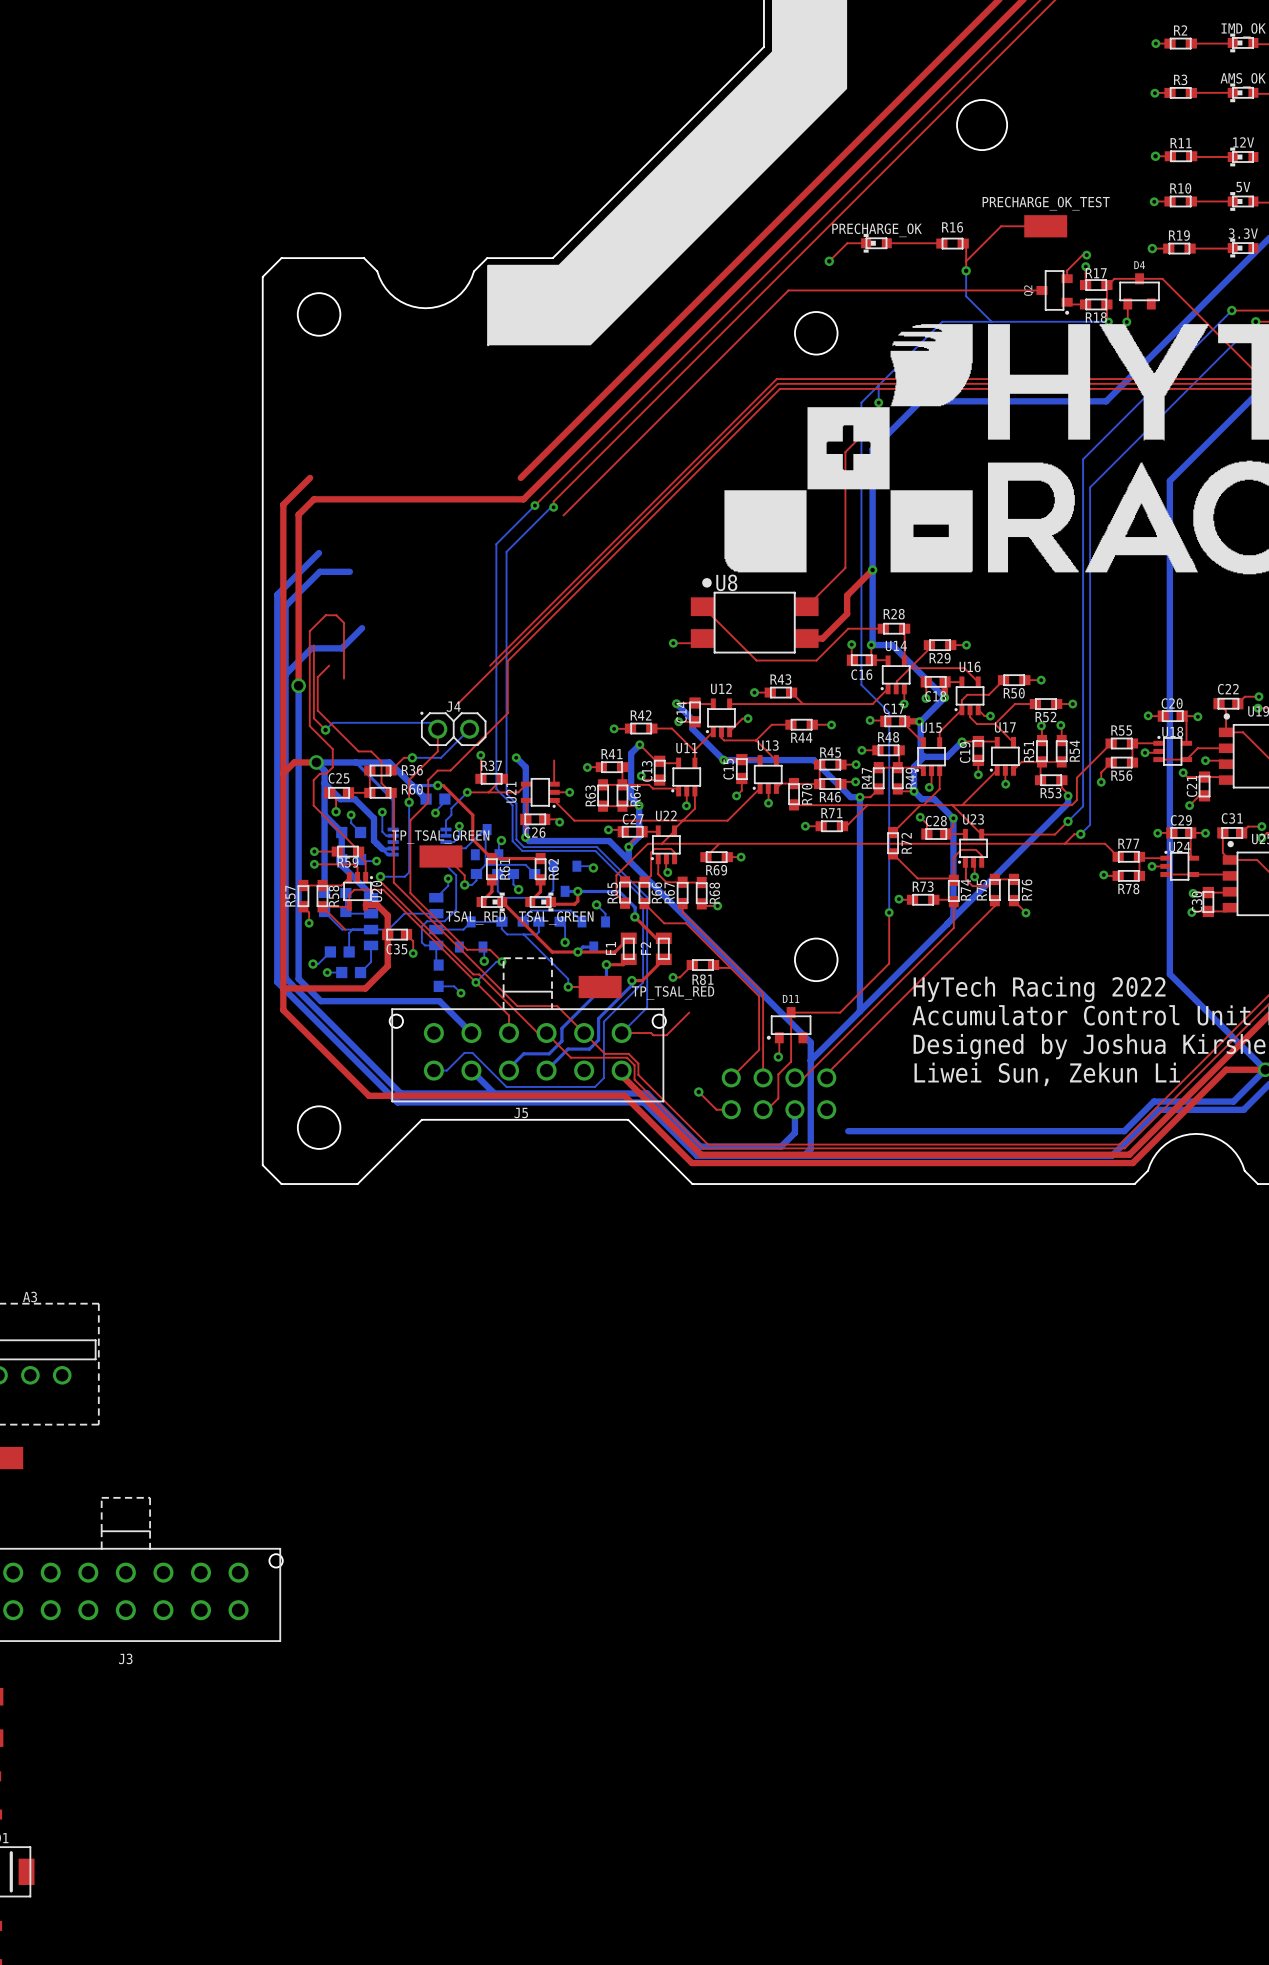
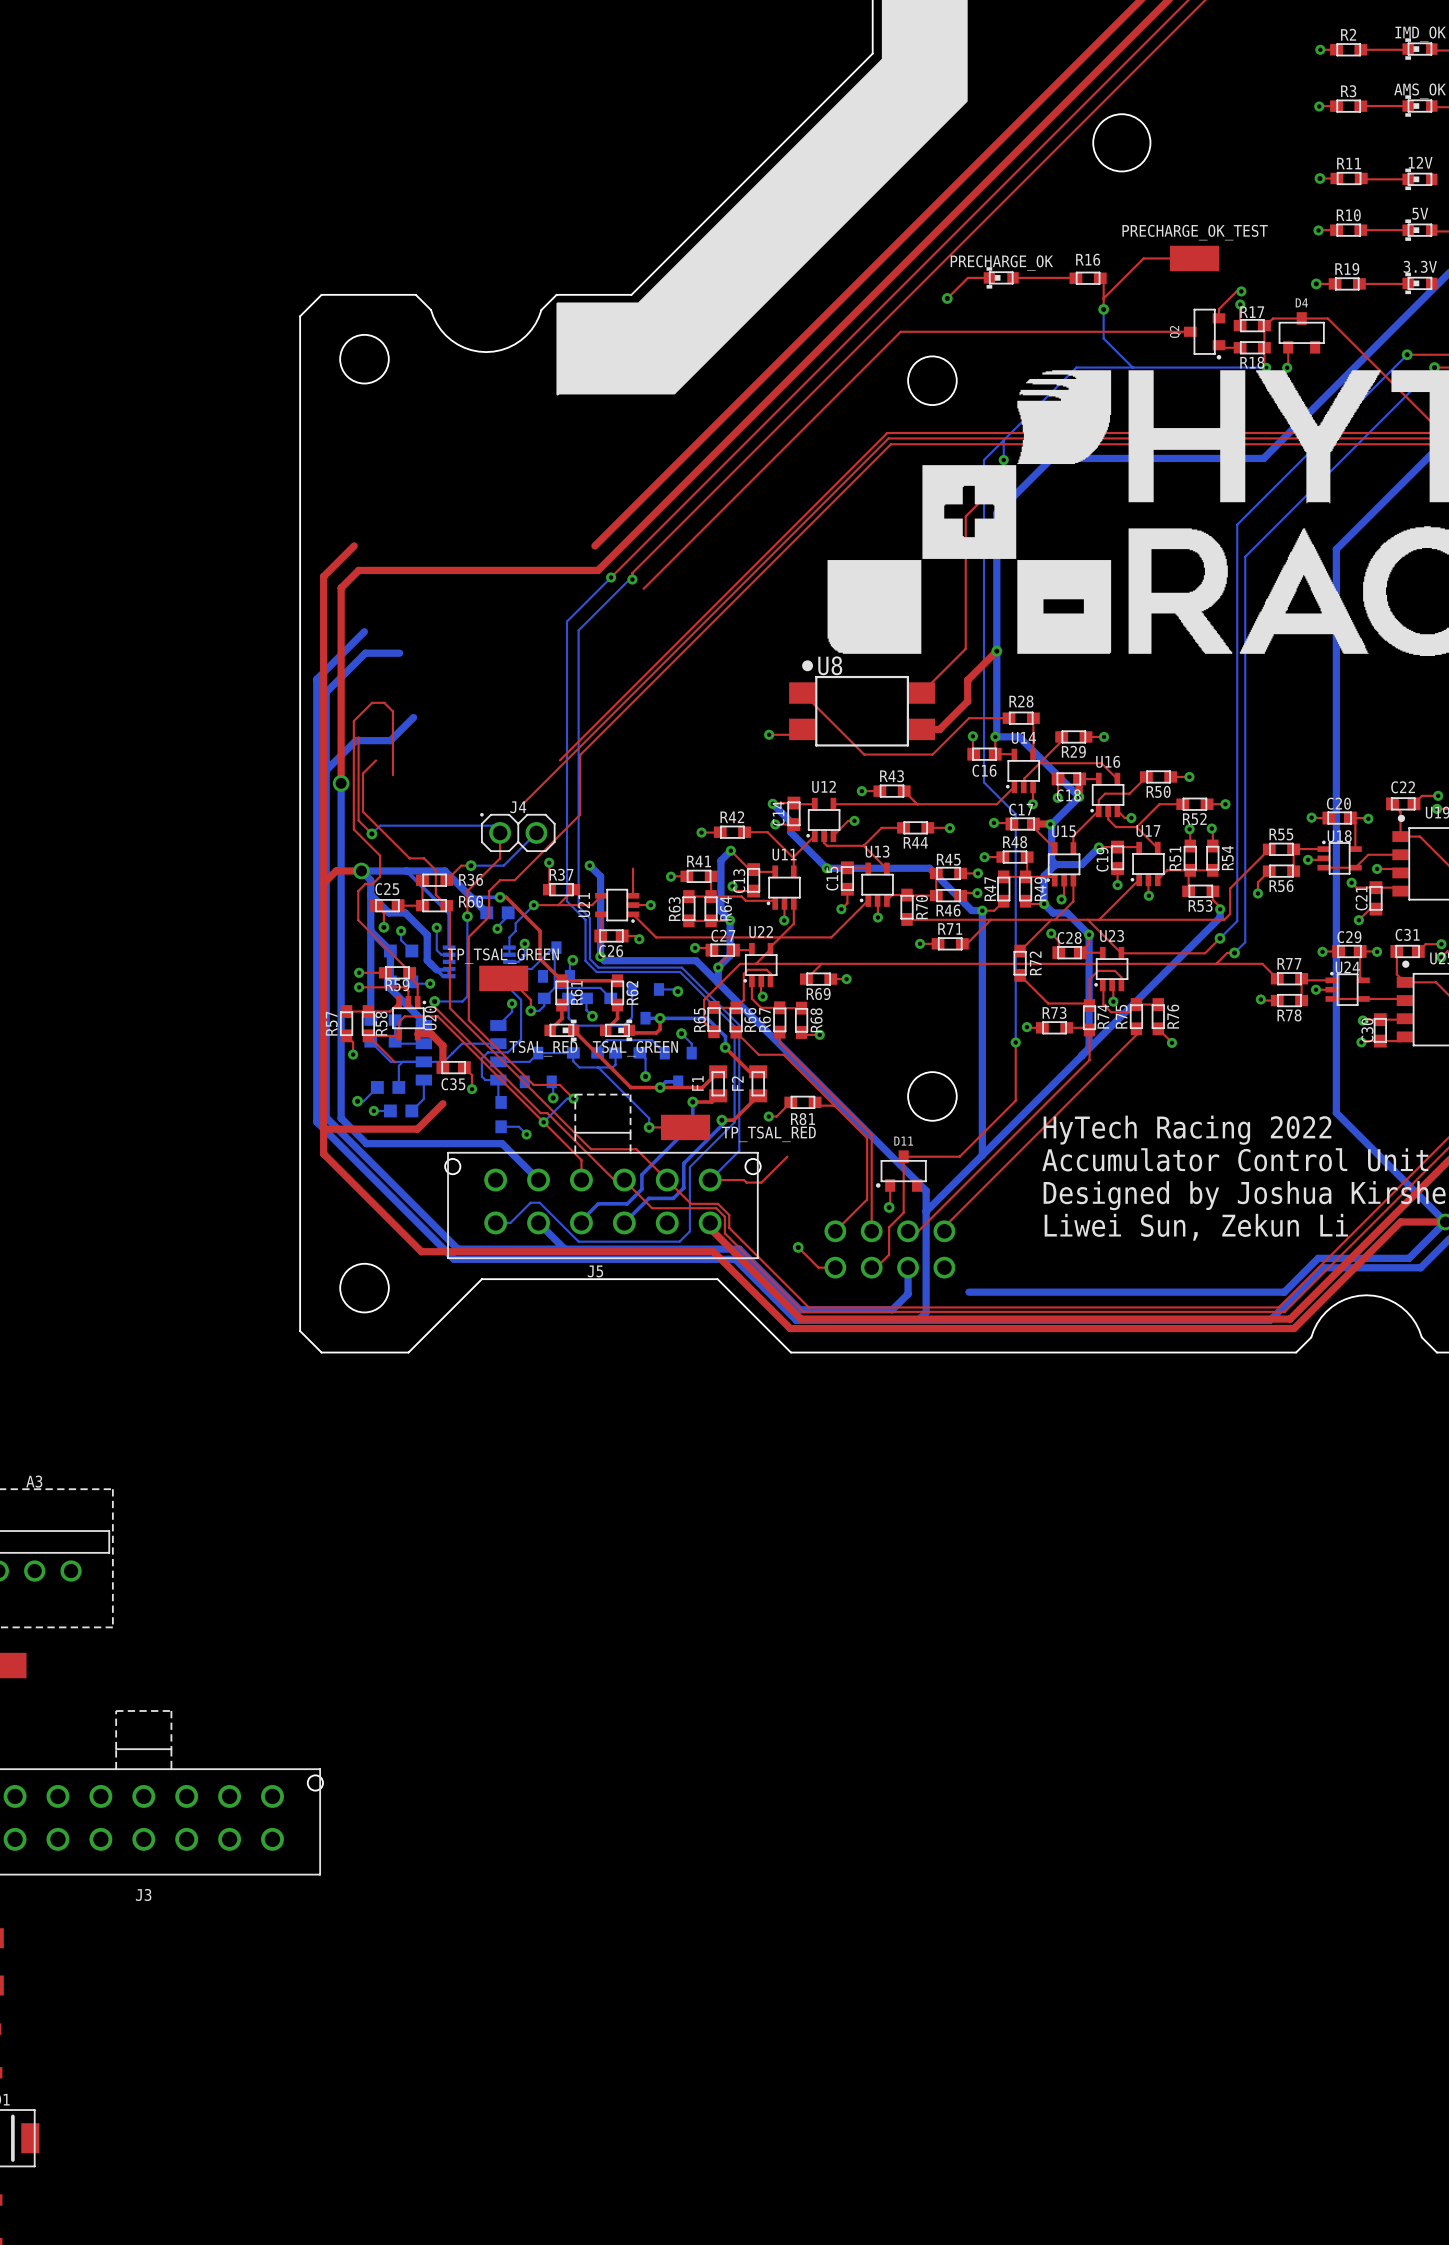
top track: (387, 934) (387, 966) -> none

